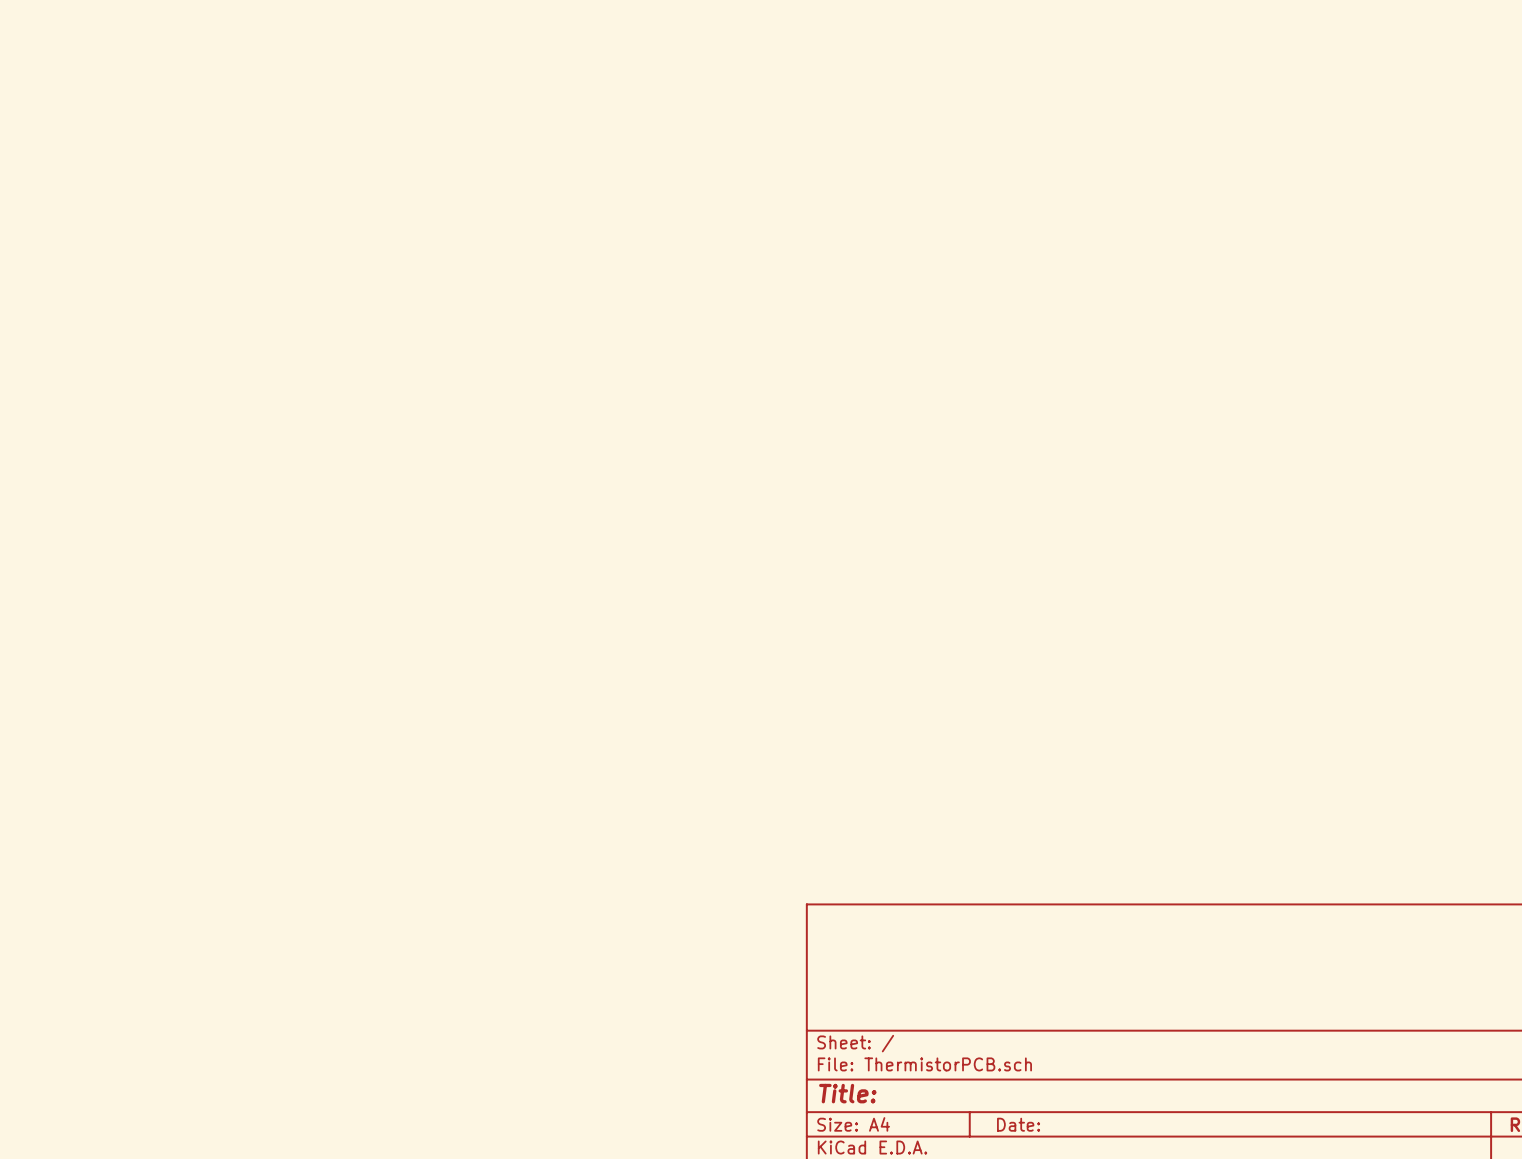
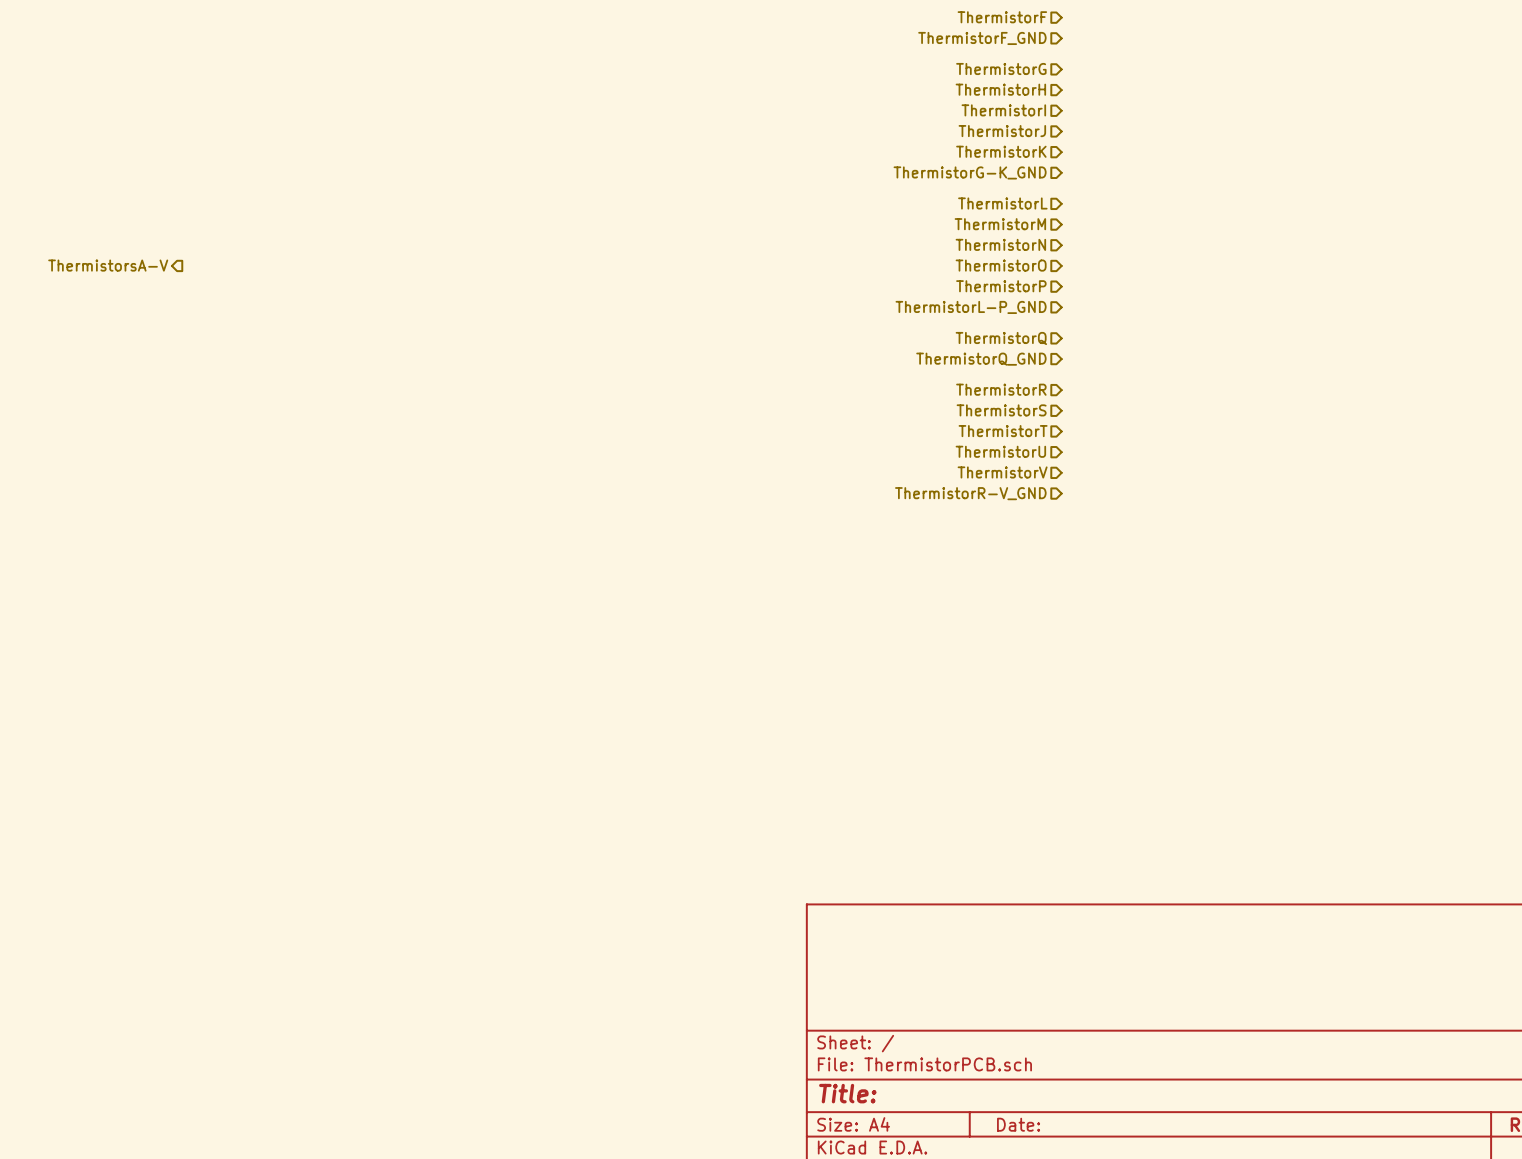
hierarchical label: none -> ThermistorF (1002, 17)
hierarchical label: none -> ThermistorF_GND (982, 38)
hierarchical label: none -> ThermistorG (1001, 69)
hierarchical label: none -> ThermistorH (1000, 89)
hierarchical label: none -> ThermistorI (1003, 110)
hierarchical label: none -> ThermistorJ (1002, 131)
hierarchical label: none -> ThermistorK (1001, 151)
hierarchical label: none -> ThermistorG-K_GND (970, 172)
hierarchical label: none -> ThermistorL (1002, 203)
hierarchical label: none -> ThermistorM (1000, 224)
hierarchical label: none -> ThermistorN (1000, 244)
hierarchical label: none -> ThermistorsA-V (108, 265)
hierarchical label: none -> ThermistorO (1001, 265)
hierarchical label: none -> ThermistorP (1001, 286)
hierarchical label: none -> ThermistorL-P_GND (971, 307)
hierarchical label: none -> ThermistorQ (1001, 338)
hierarchical label: none -> ThermistorQ_GND (981, 359)
hierarchical label: none -> ThermistorR (1001, 389)
hierarchical label: none -> ThermistorS (1001, 410)
hierarchical label: none -> ThermistorT (1003, 431)
hierarchical label: none -> ThermistorU (1000, 451)
hierarchical label: none -> ThermistorV (1002, 472)
hierarchical label: none -> ThermistorR-V_GND (970, 493)

